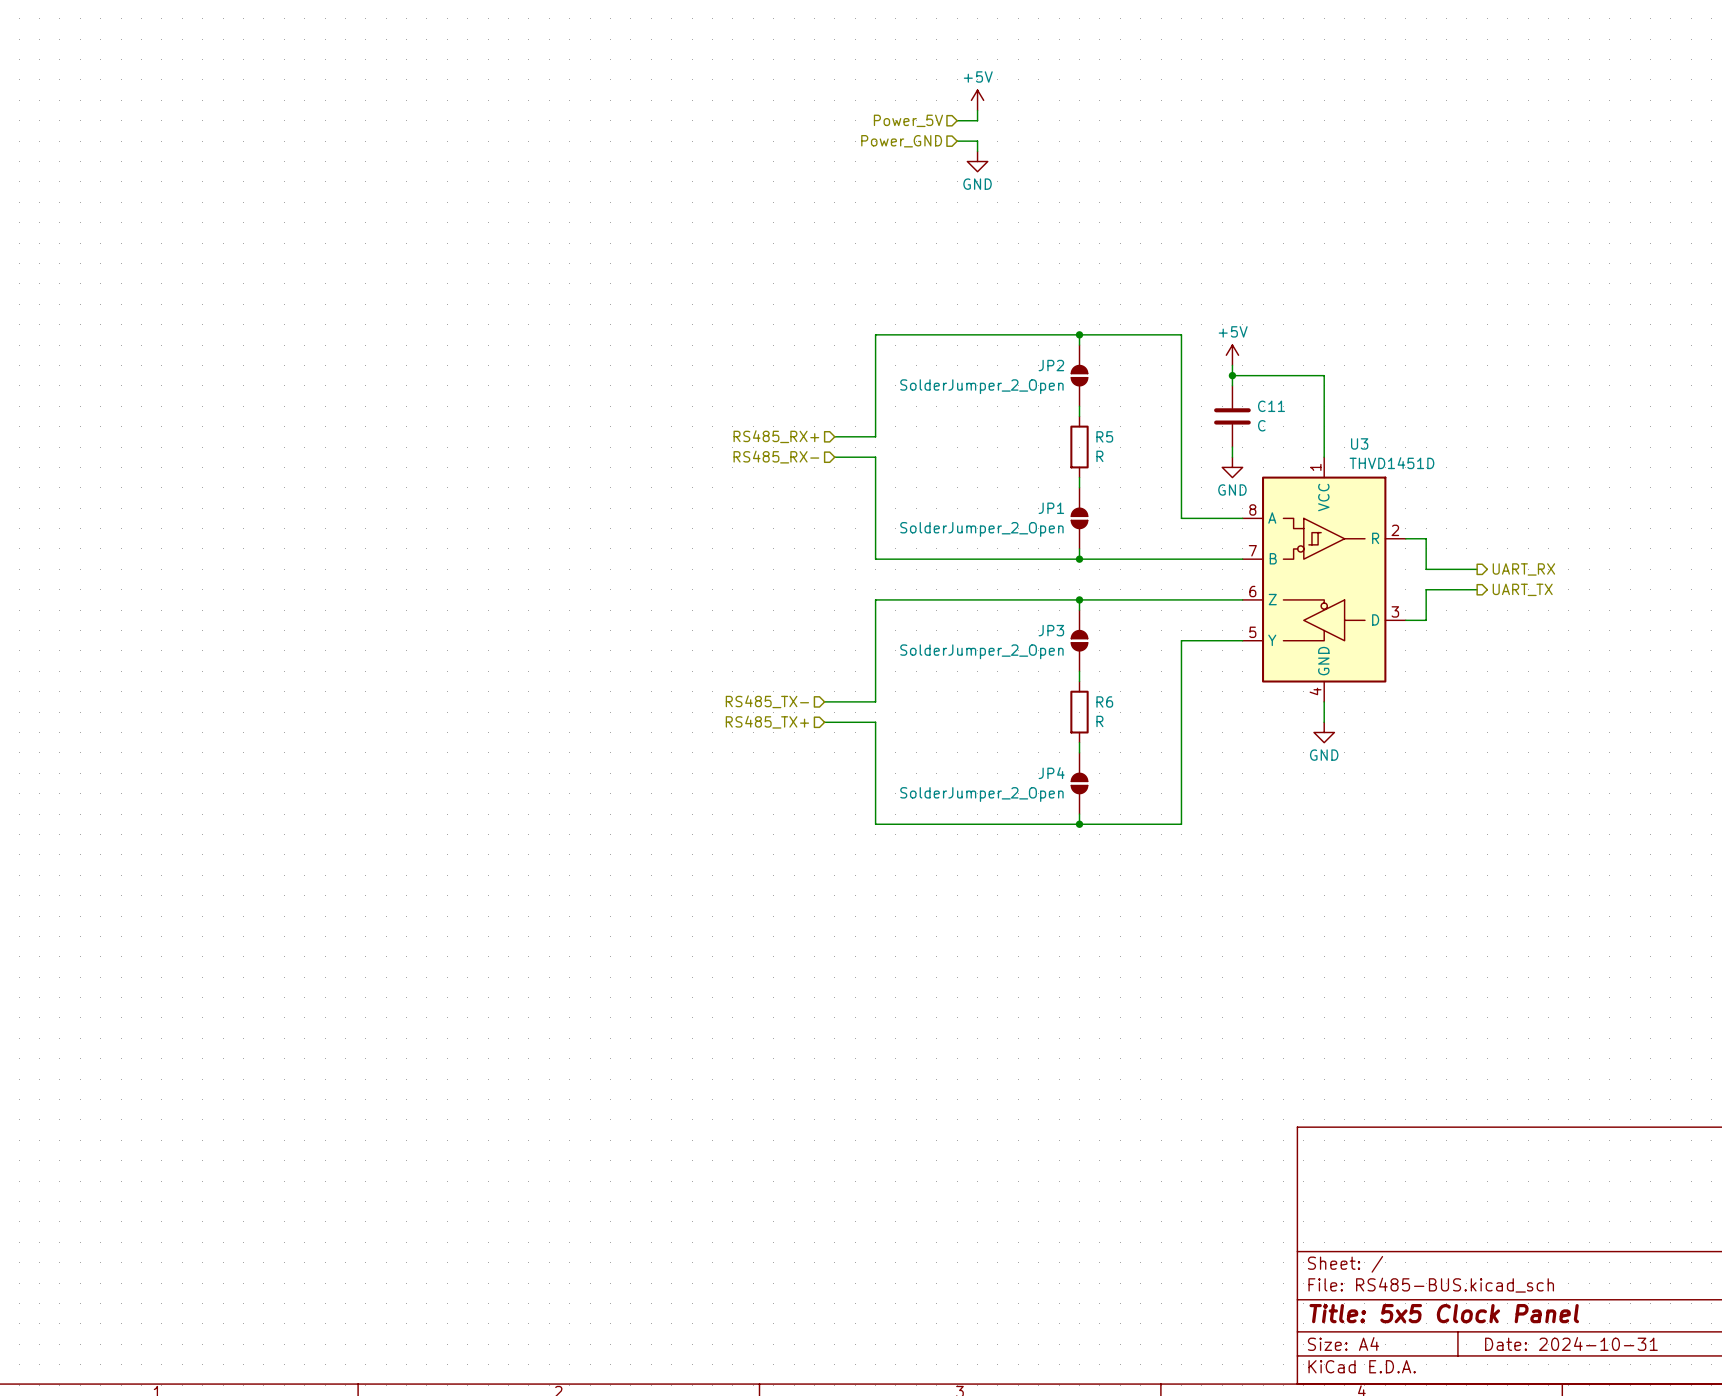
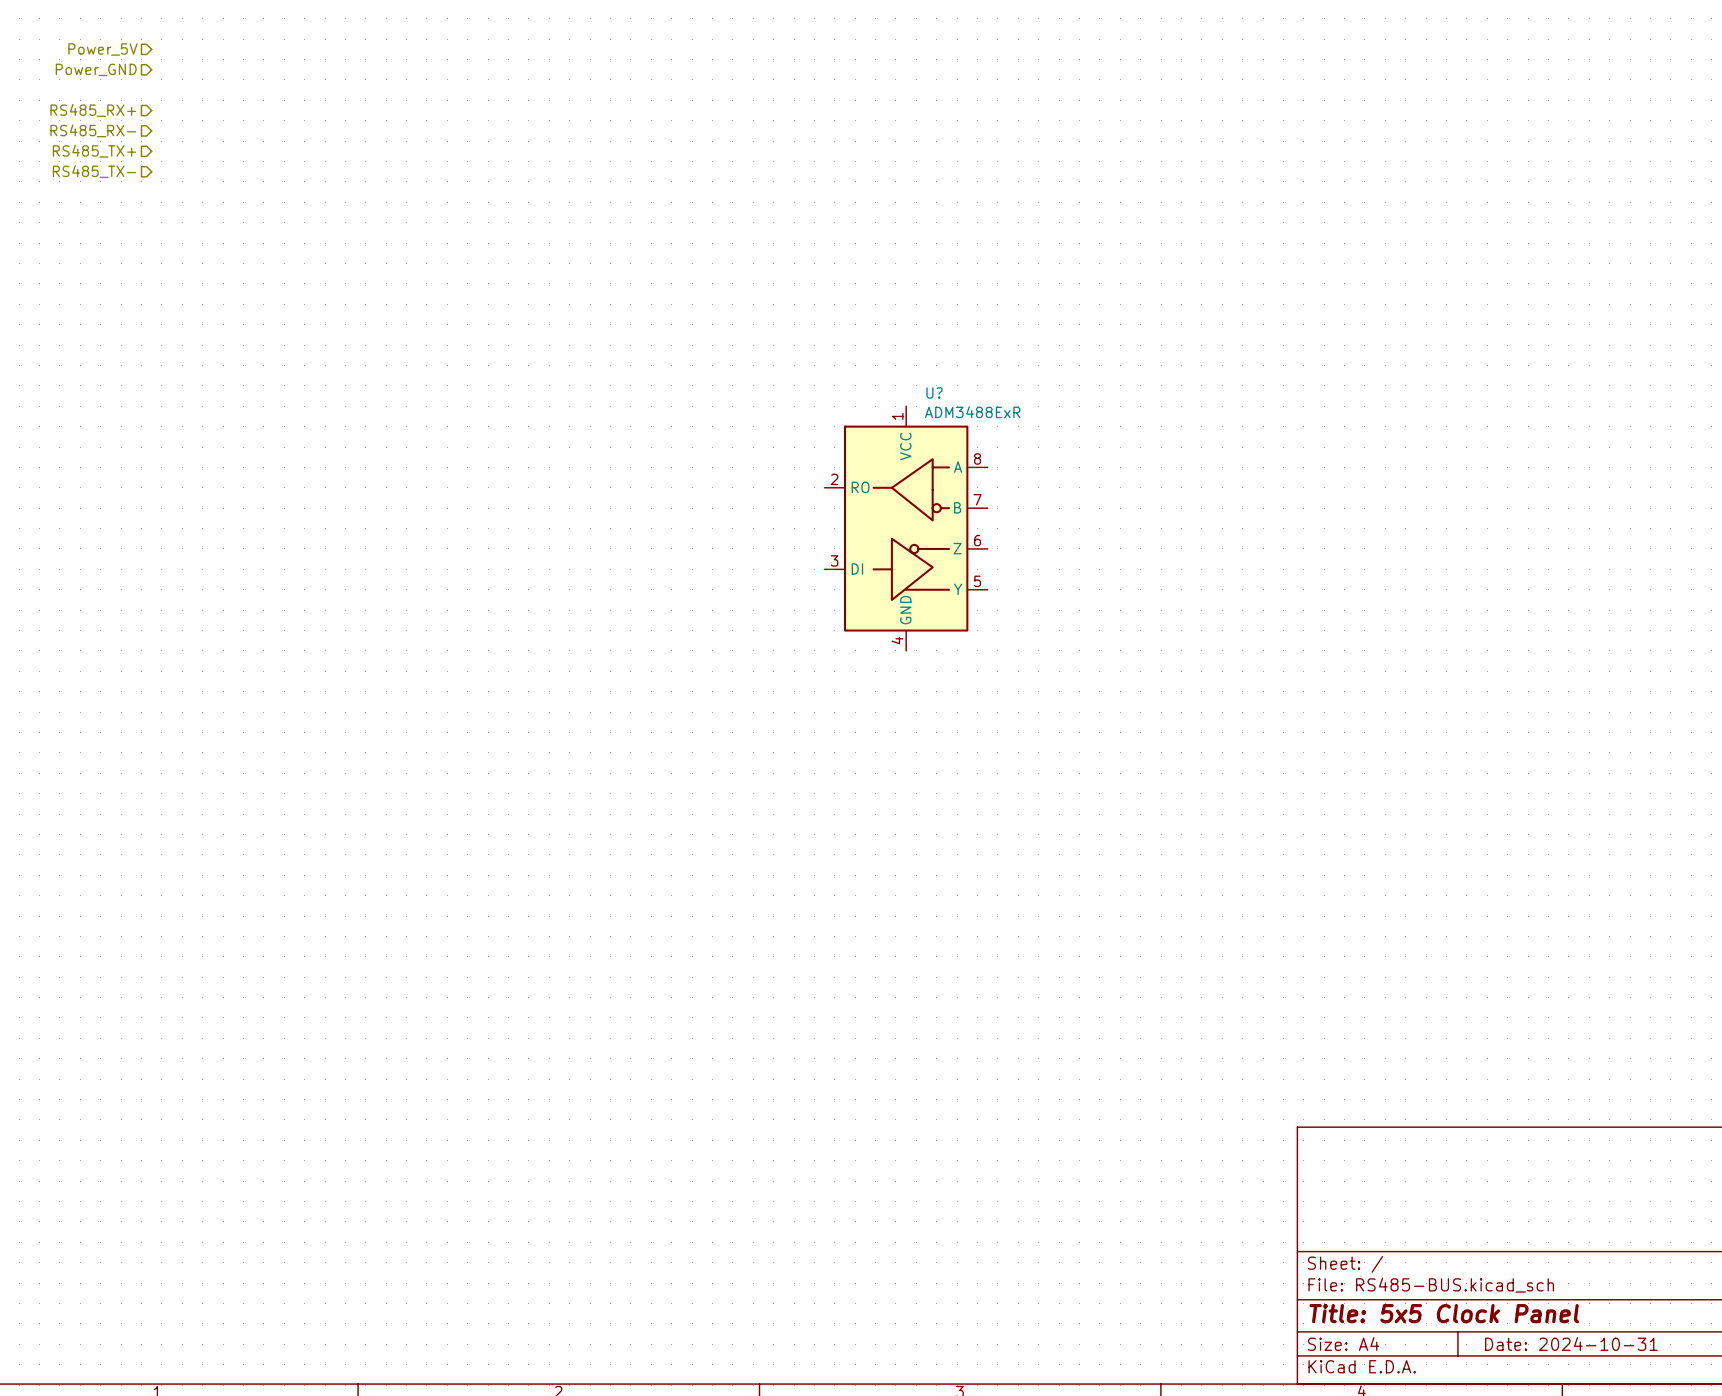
hierarchical label: none -> Power_5V (102, 49)
hierarchical label: none -> Power_GND (96, 69)
power symbol: +5V (977, 100) -> none
hierarchical label: none -> RS485_RX+ (93, 110)
wire: (977, 110) (977, 120) (957, 120) -> none
hierarchical label: Power_5V (908, 120) -> none
hierarchical label: none -> RS485_RX- (93, 130)
hierarchical label: Power_GND (901, 141) -> none
wire: (957, 141) (977, 141) (977, 151) -> none
hierarchical label: none -> RS485_TX+ (94, 151)
power symbol: GND (977, 161) -> none
hierarchical label: none -> RS485_TX- (94, 171)
wire: (1079, 334) (1079, 345) -> none
junction: (1079, 334) -> none
power symbol: +5V (1232, 355) -> none
wire: (1232, 365) (1232, 385) -> none
JP2: SolderJumper_2_Open (1079, 375) -> none
wire: (1232, 375) (1324, 375) (1324, 457) -> none
junction: (1232, 375) -> none
wire: (1079, 406) (1079, 416) -> none
C11: C (1232, 416) -> none
hierarchical label: RS485_RX+ (776, 436) -> none
wire: (834, 436) (875, 436) (875, 334) (1181, 334) (1181, 518) (1242, 518) -> none
R5: R (1079, 447) -> none
wire: (1232, 447) (1232, 457) -> none
hierarchical label: RS485_RX- (776, 457) -> none
wire: (834, 457) (875, 457) (875, 559) (1242, 559) -> none
power symbol: GND (1232, 467) -> none
wire: (1079, 477) (1079, 487) -> none
JP1: SolderJumper_2_Open (1079, 518) -> none
U?: none -> ADM3488ExR (906, 528)
wire: (1405, 538) (1426, 538) (1426, 569) (1477, 569) -> none
wire: (1079, 548) (1079, 559) -> none
junction: (1079, 559) -> none
hierarchical label: UART_RX (1523, 569) -> none
U3: THVD1451D (1324, 579) -> none
wire: (1477, 589) (1426, 589) (1426, 620) (1405, 620) -> none
hierarchical label: UART_TX (1522, 589) -> none
wire: (1079, 599) (1079, 610) -> none
junction: (1079, 599) -> none
wire: (1242, 599) (875, 599) (875, 701) (824, 701) -> none
JP3: SolderJumper_2_Open (1079, 640) -> none
wire: (1242, 640) (1181, 640) (1181, 824) (875, 824) (875, 722) (824, 722) -> none
wire: (1079, 671) (1079, 681) -> none
hierarchical label: RS485_TX- (767, 701) -> none
wire: (1324, 701) (1324, 722) -> none
R6: R (1079, 712) -> none
hierarchical label: RS485_TX+ (767, 722) -> none
power symbol: GND (1324, 732) -> none
wire: (1079, 742) (1079, 752) -> none
JP4: SolderJumper_2_Open (1079, 783) -> none
wire: (1079, 814) (1079, 824) -> none
junction: (1079, 824) -> none

